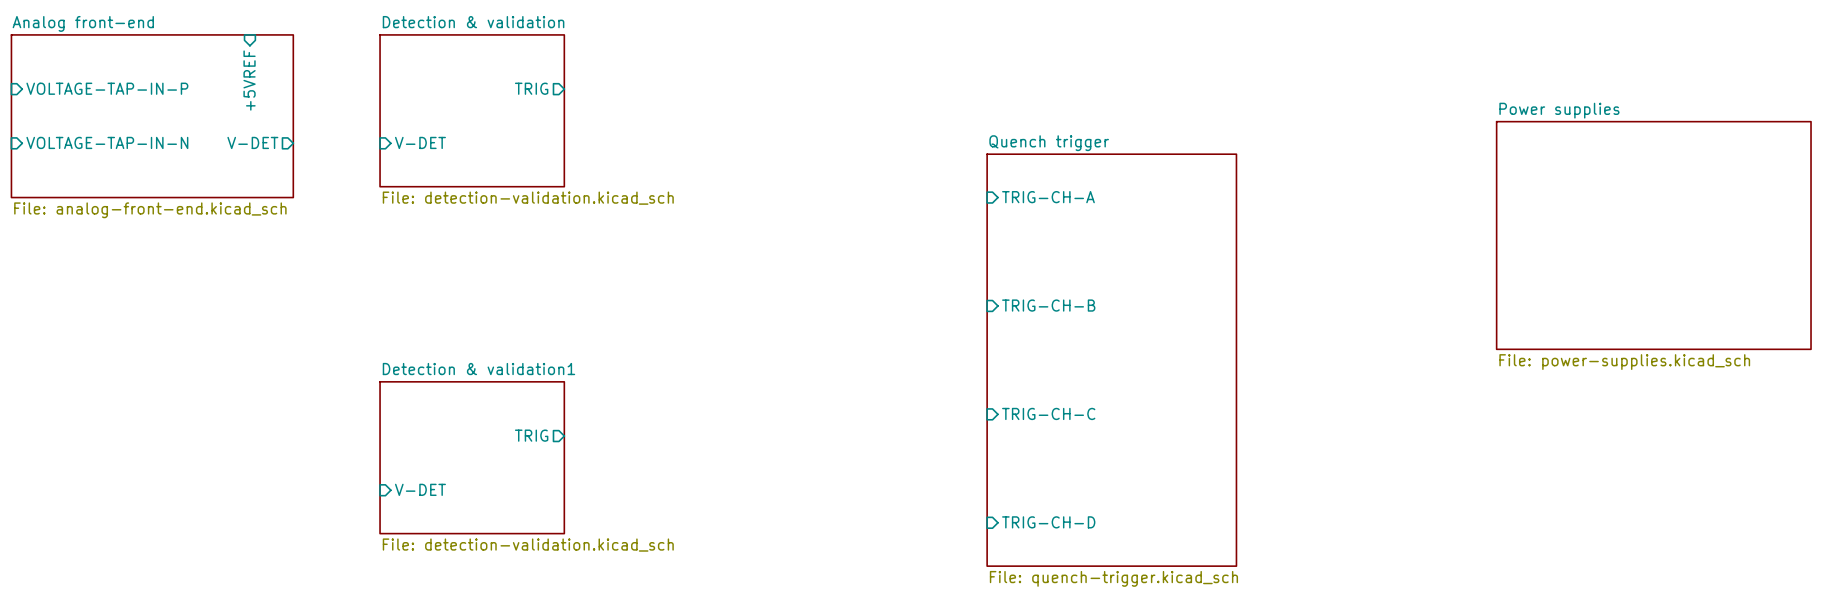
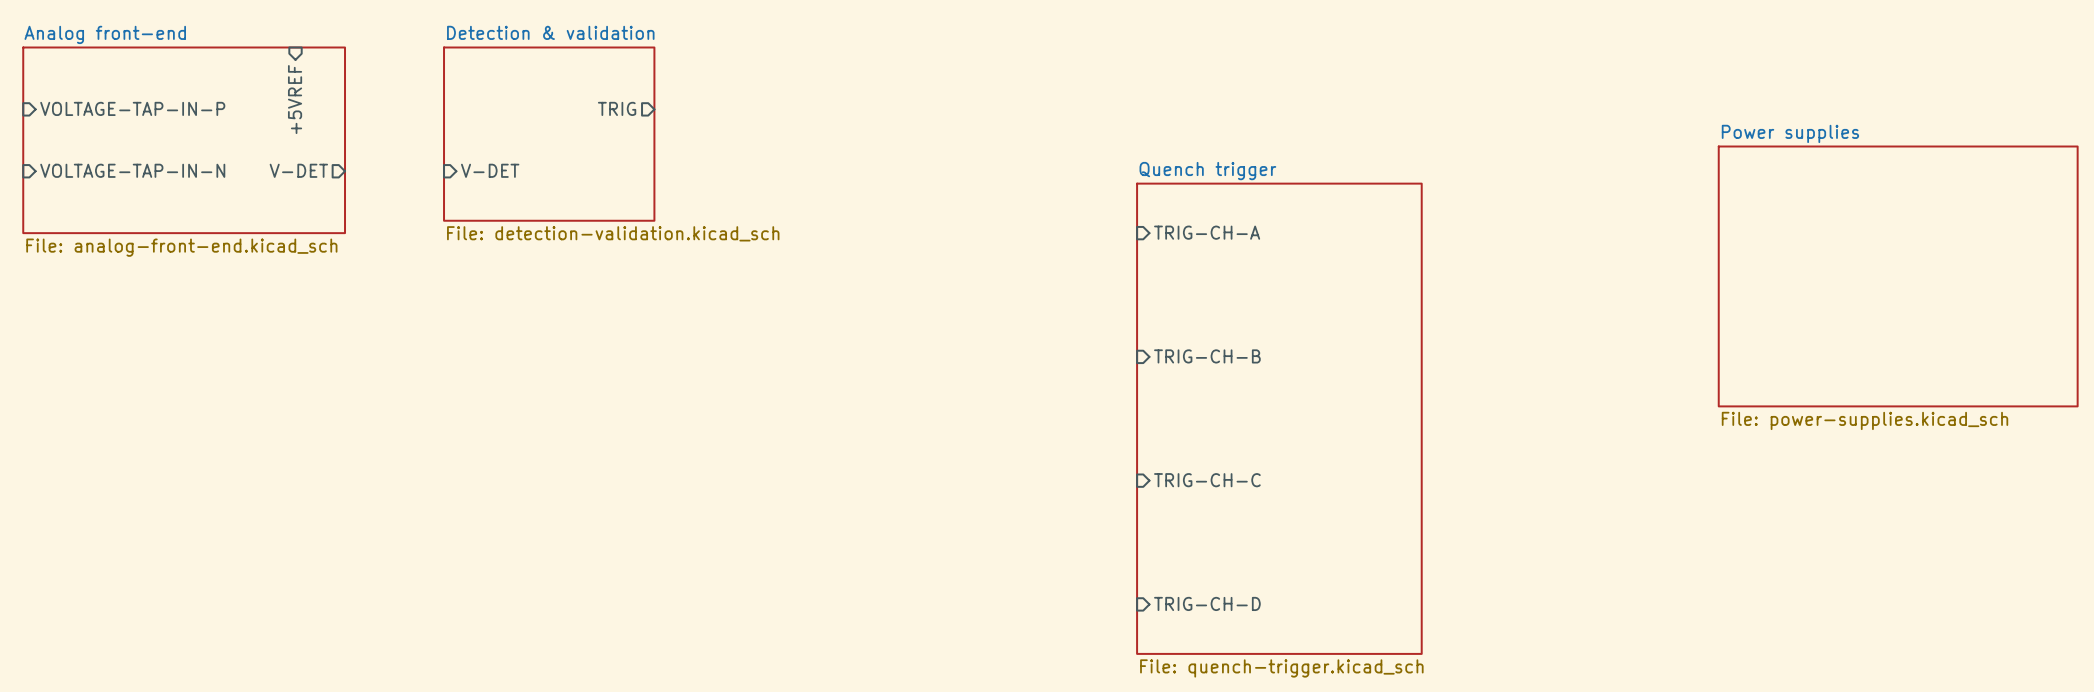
sheet pin: TRIG (531, 435) -> none
sheet Detection & validation1: File: detection-validation.kicad_sch (472, 457) -> none
sheet pin: V-DET (420, 489) -> none

